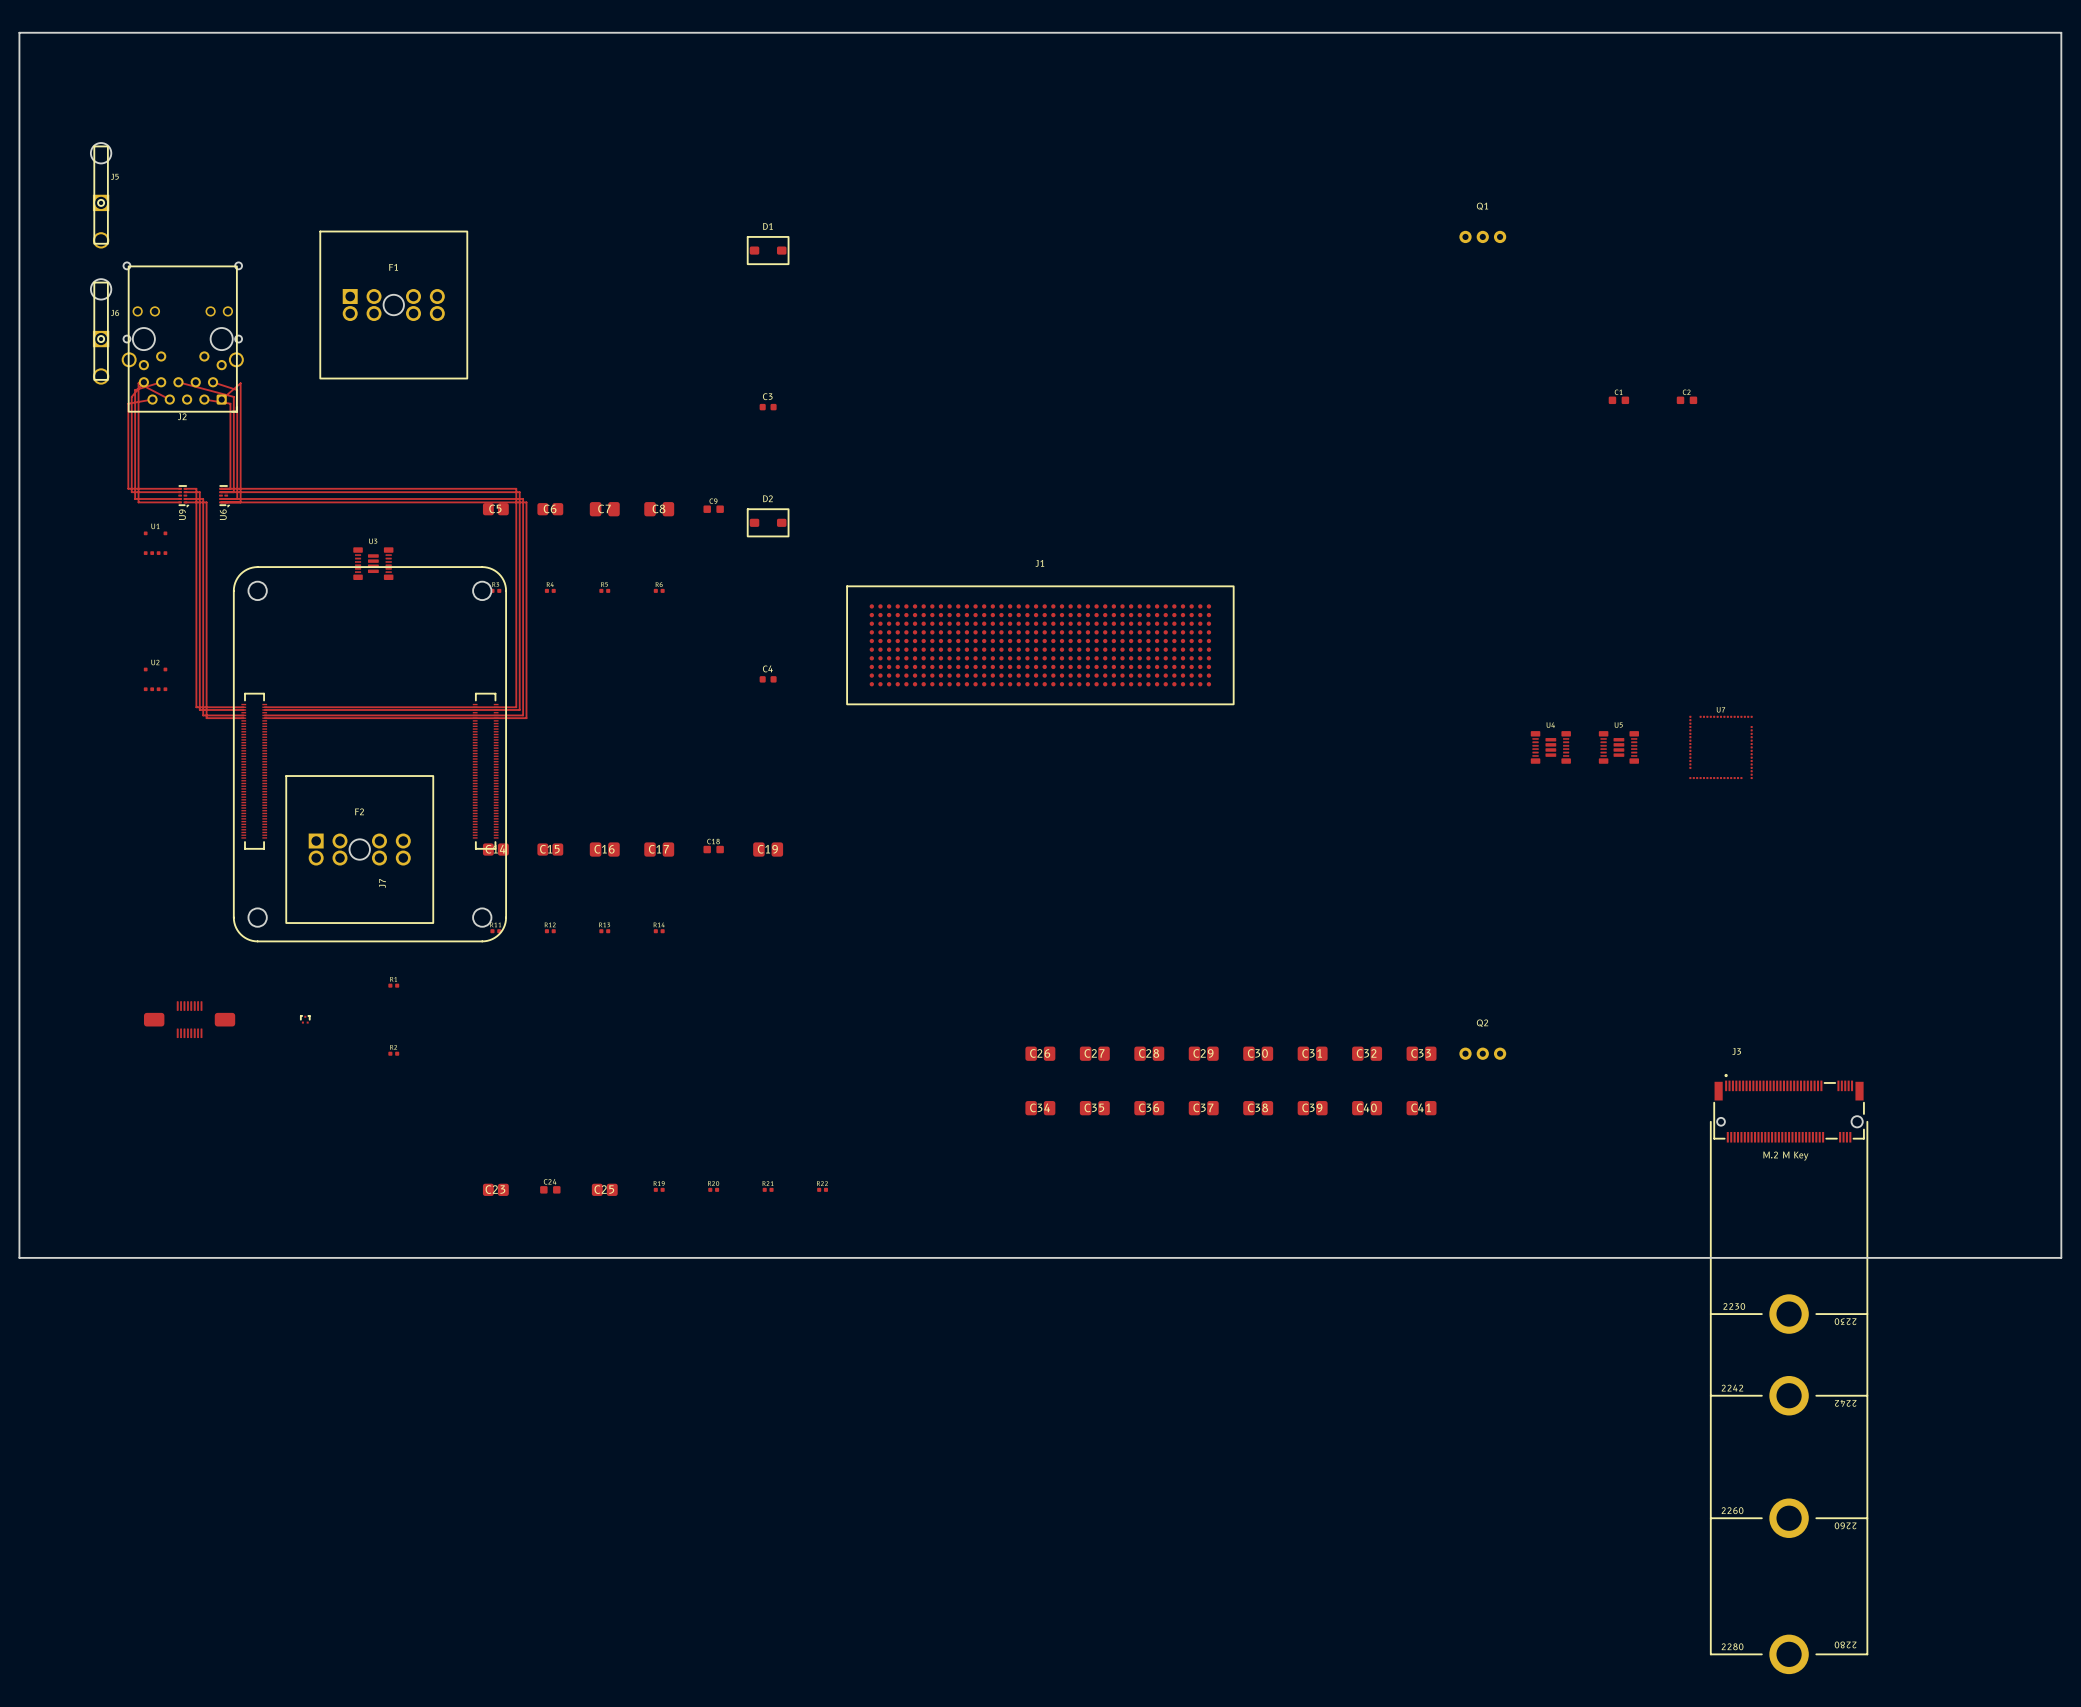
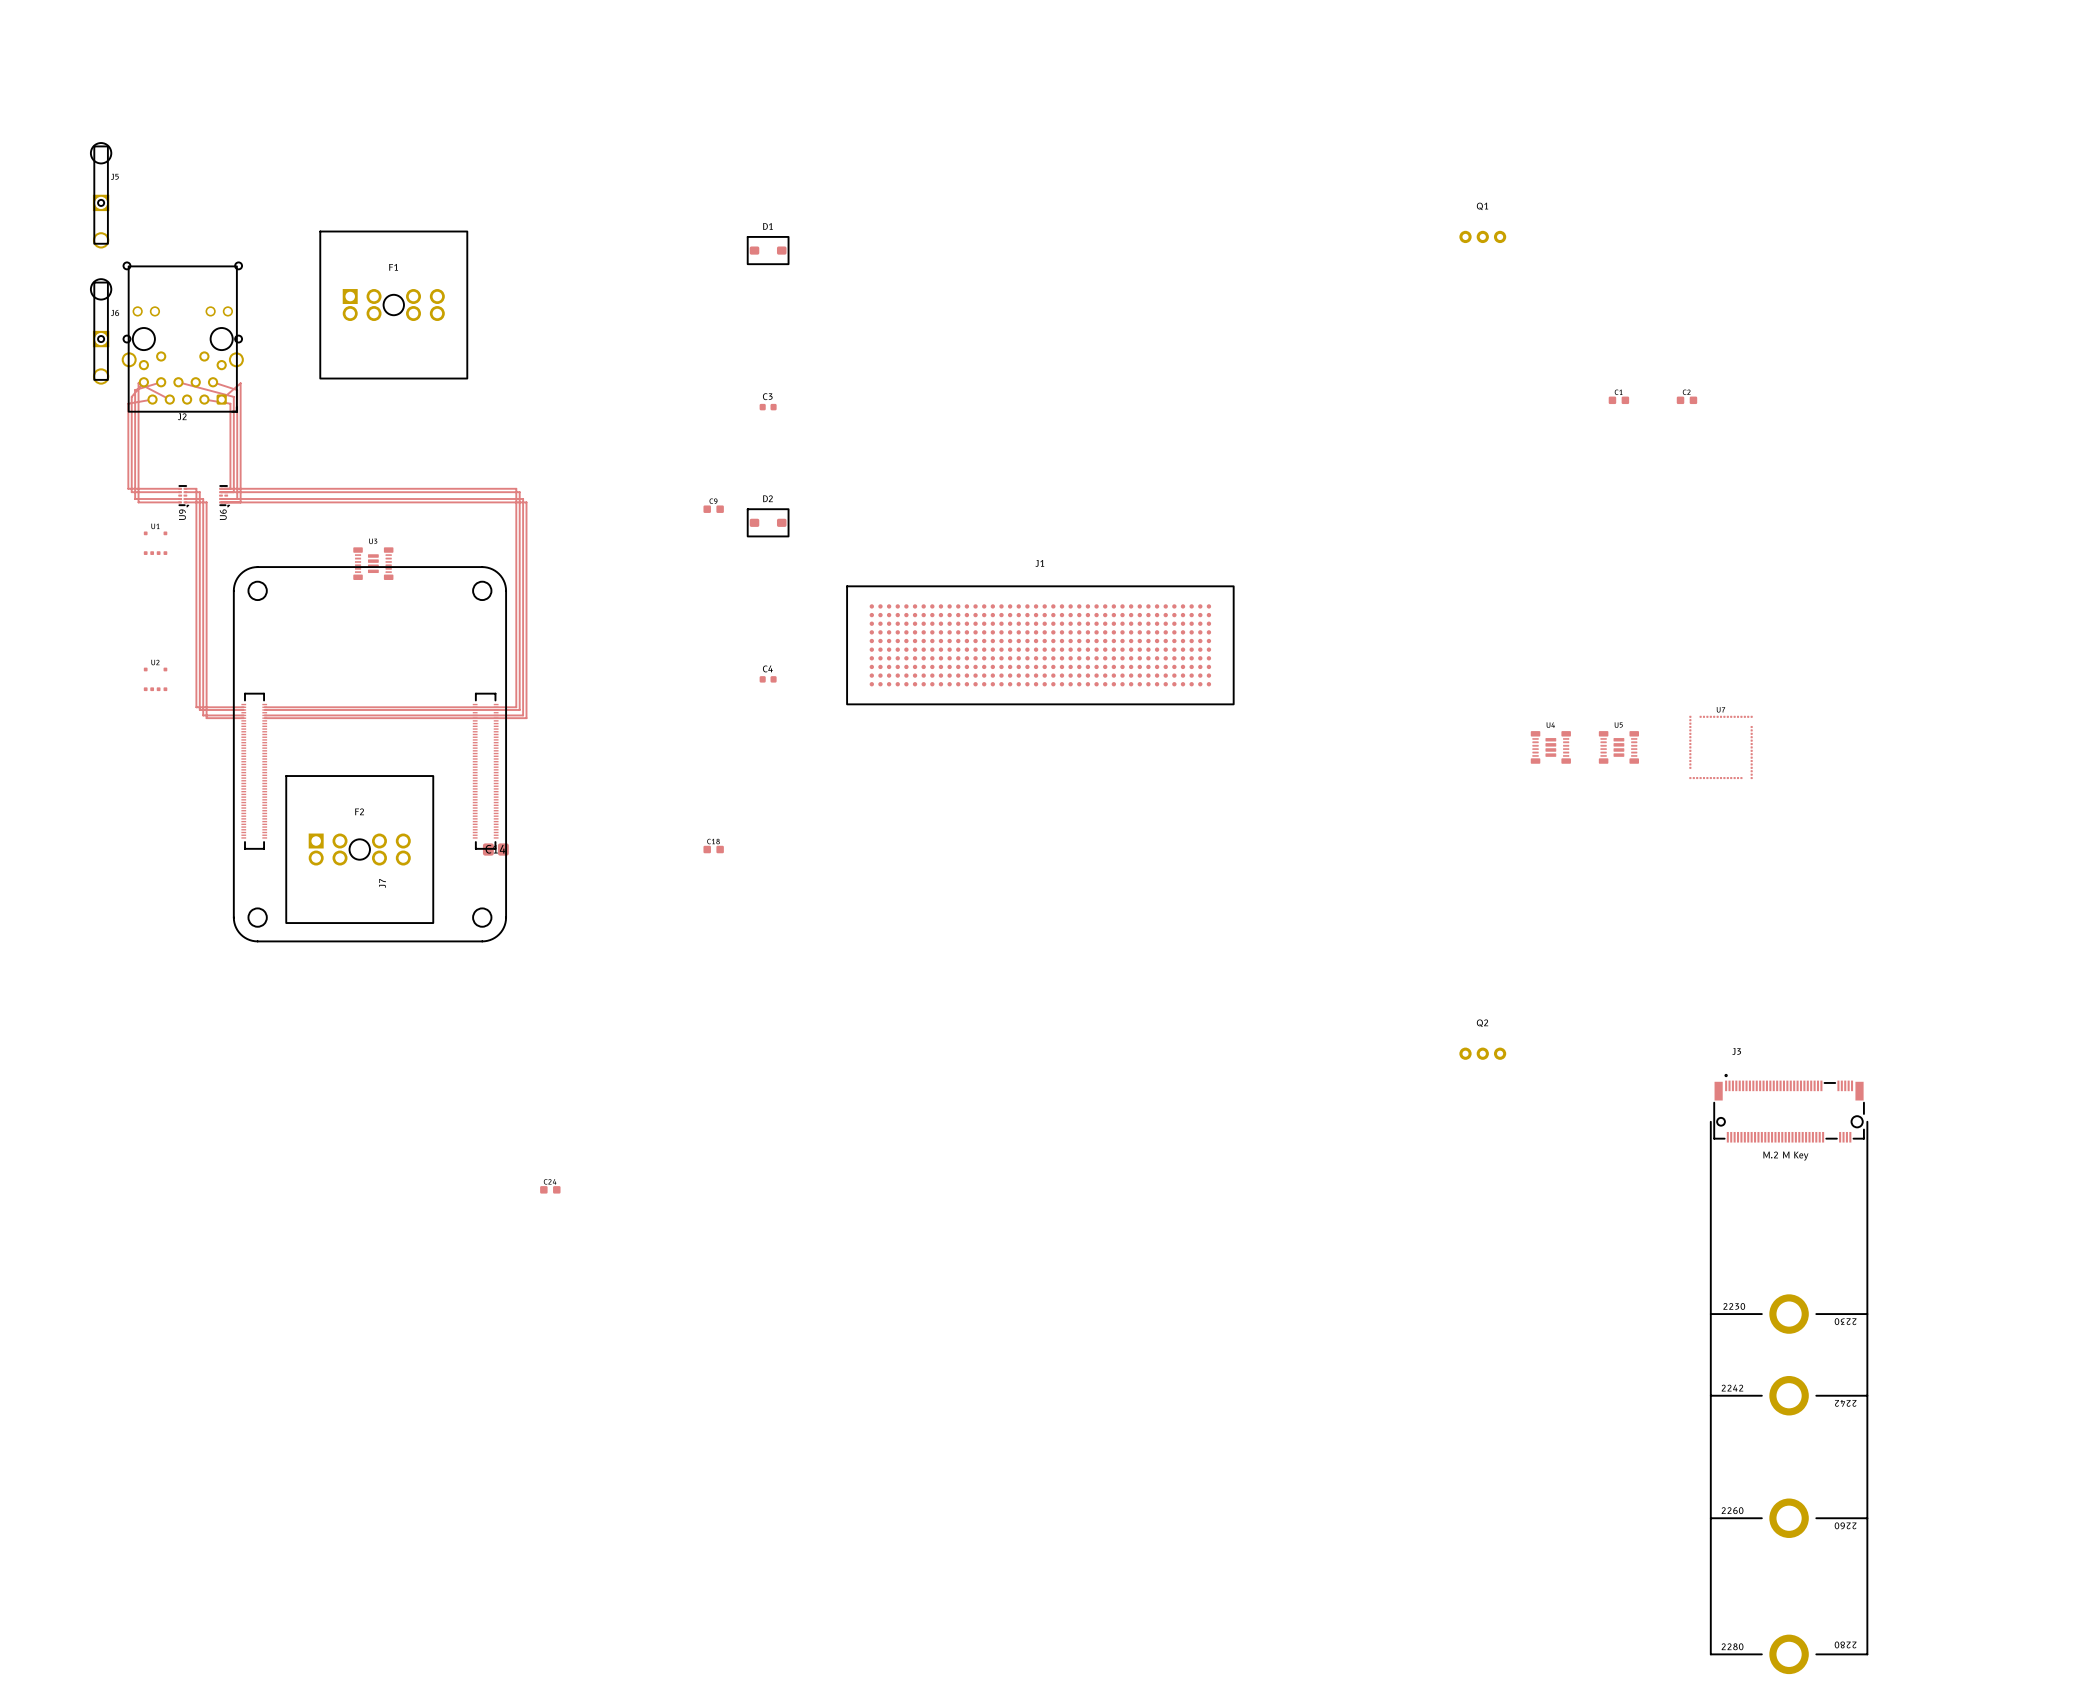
board edge: (19, 32) (2061, 32) (2061, 1257) (19, 1257) (19, 32) -> none
C5: (495, 509) -> none
C6: (550, 509) -> none
C7: (604, 509) -> none
C8: (659, 509) -> none
part: (495, 590) -> none
part: (550, 590) -> none
part: (604, 590) -> none
part: (659, 590) -> none
C15: (550, 849) -> none
C16: (604, 849) -> none
C17: (659, 849) -> none
C19: (768, 849) -> none
part: (495, 931) -> none
part: (550, 931) -> none
part: (604, 931) -> none
part: (659, 931) -> none
part: (393, 985) -> none
part: (189, 1019) -> none
part: (305, 1019) -> none
part: (393, 1053) -> none
C26: (1040, 1053) -> none
C27: (1094, 1053) -> none
C28: (1149, 1053) -> none
C29: (1203, 1053) -> none
C30: (1258, 1053) -> none
C31: (1312, 1053) -> none
C32: (1367, 1053) -> none
C33: (1421, 1053) -> none
C34: (1040, 1108) -> none
C35: (1094, 1108) -> none
C36: (1149, 1108) -> none
C37: (1203, 1108) -> none
C38: (1258, 1108) -> none
C39: (1312, 1108) -> none
C40: (1367, 1108) -> none
C41: (1421, 1108) -> none
C23: (495, 1189) -> none
C25: (604, 1189) -> none
part: (659, 1189) -> none
part: (713, 1189) -> none
part: (768, 1189) -> none
part: (822, 1189) -> none

